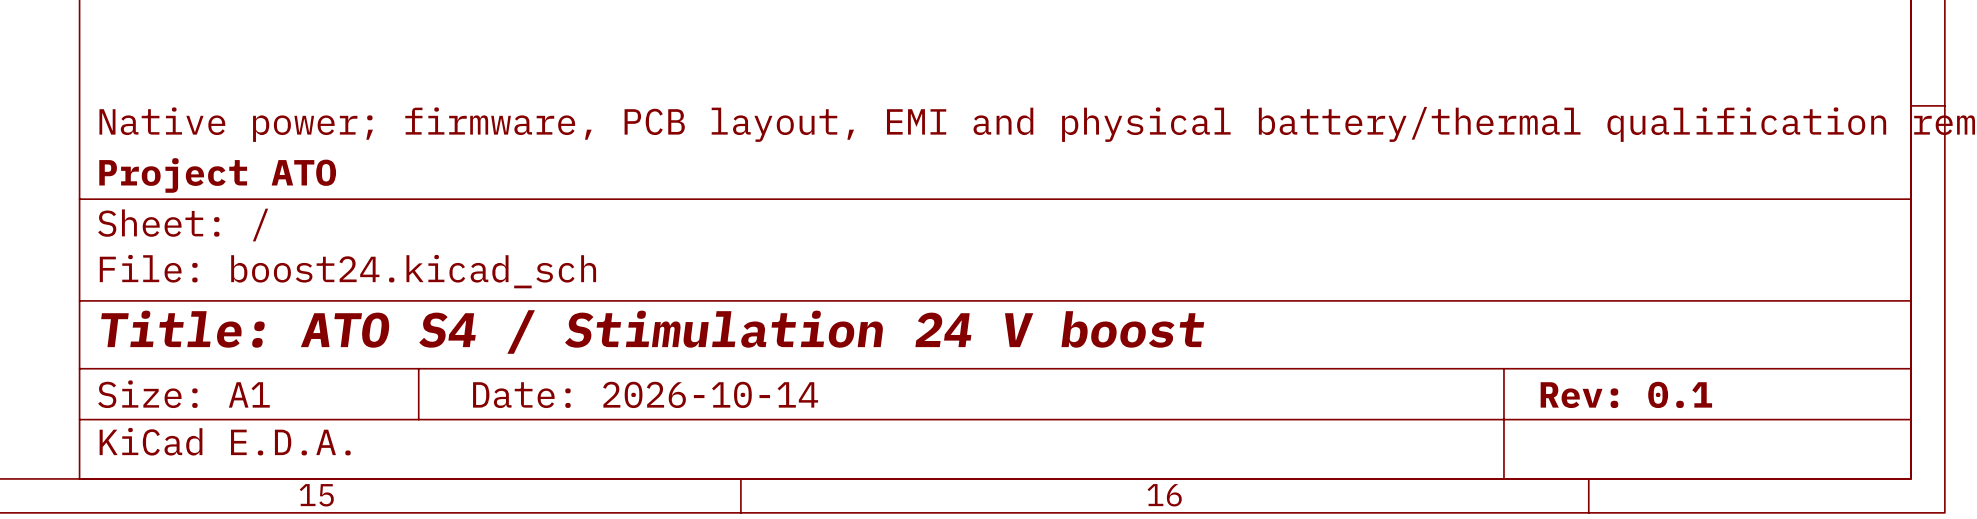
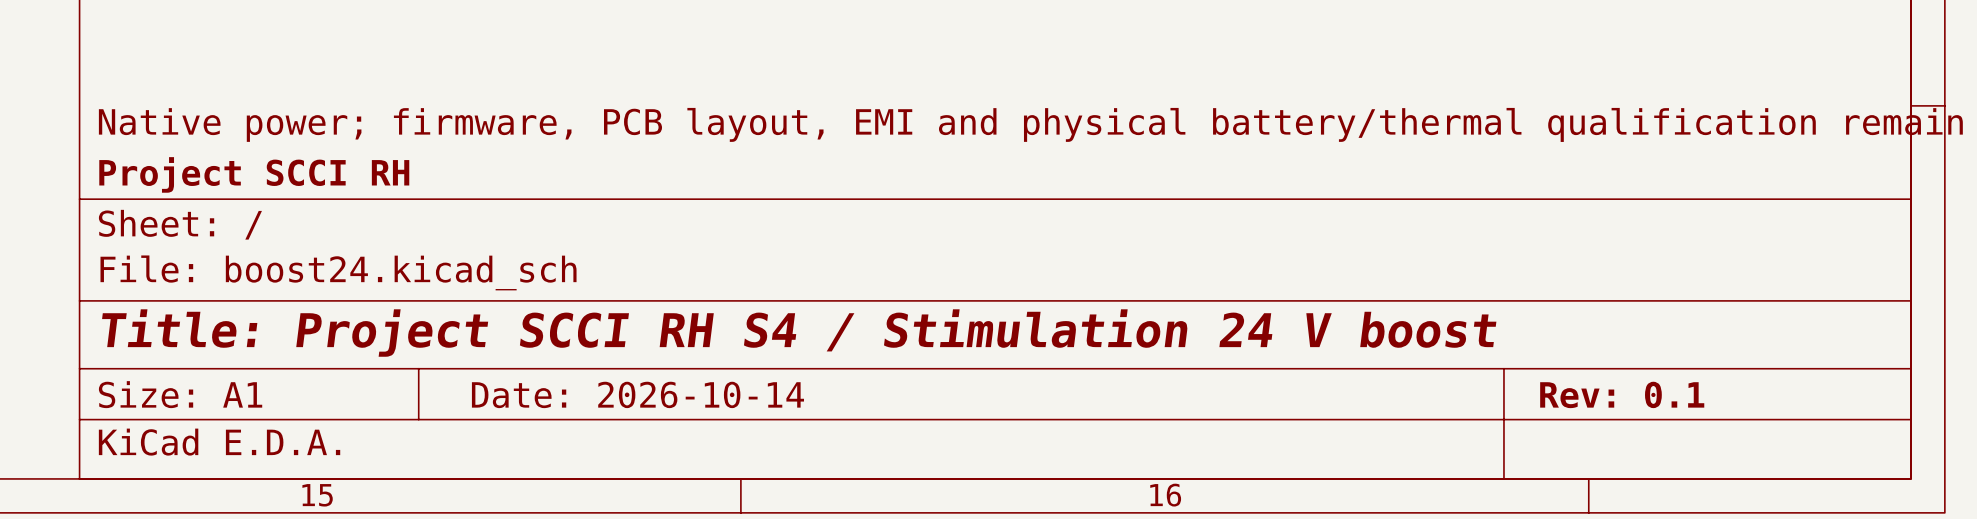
title block: Project ATO (217, 175) -> Project SCCI RH (254, 174)
title block: Title: ATO S4 / Stimulation 24 V boost (652, 332) -> Title: Project SCCI RH S4 / Stimulation 24 V boost (799, 333)

